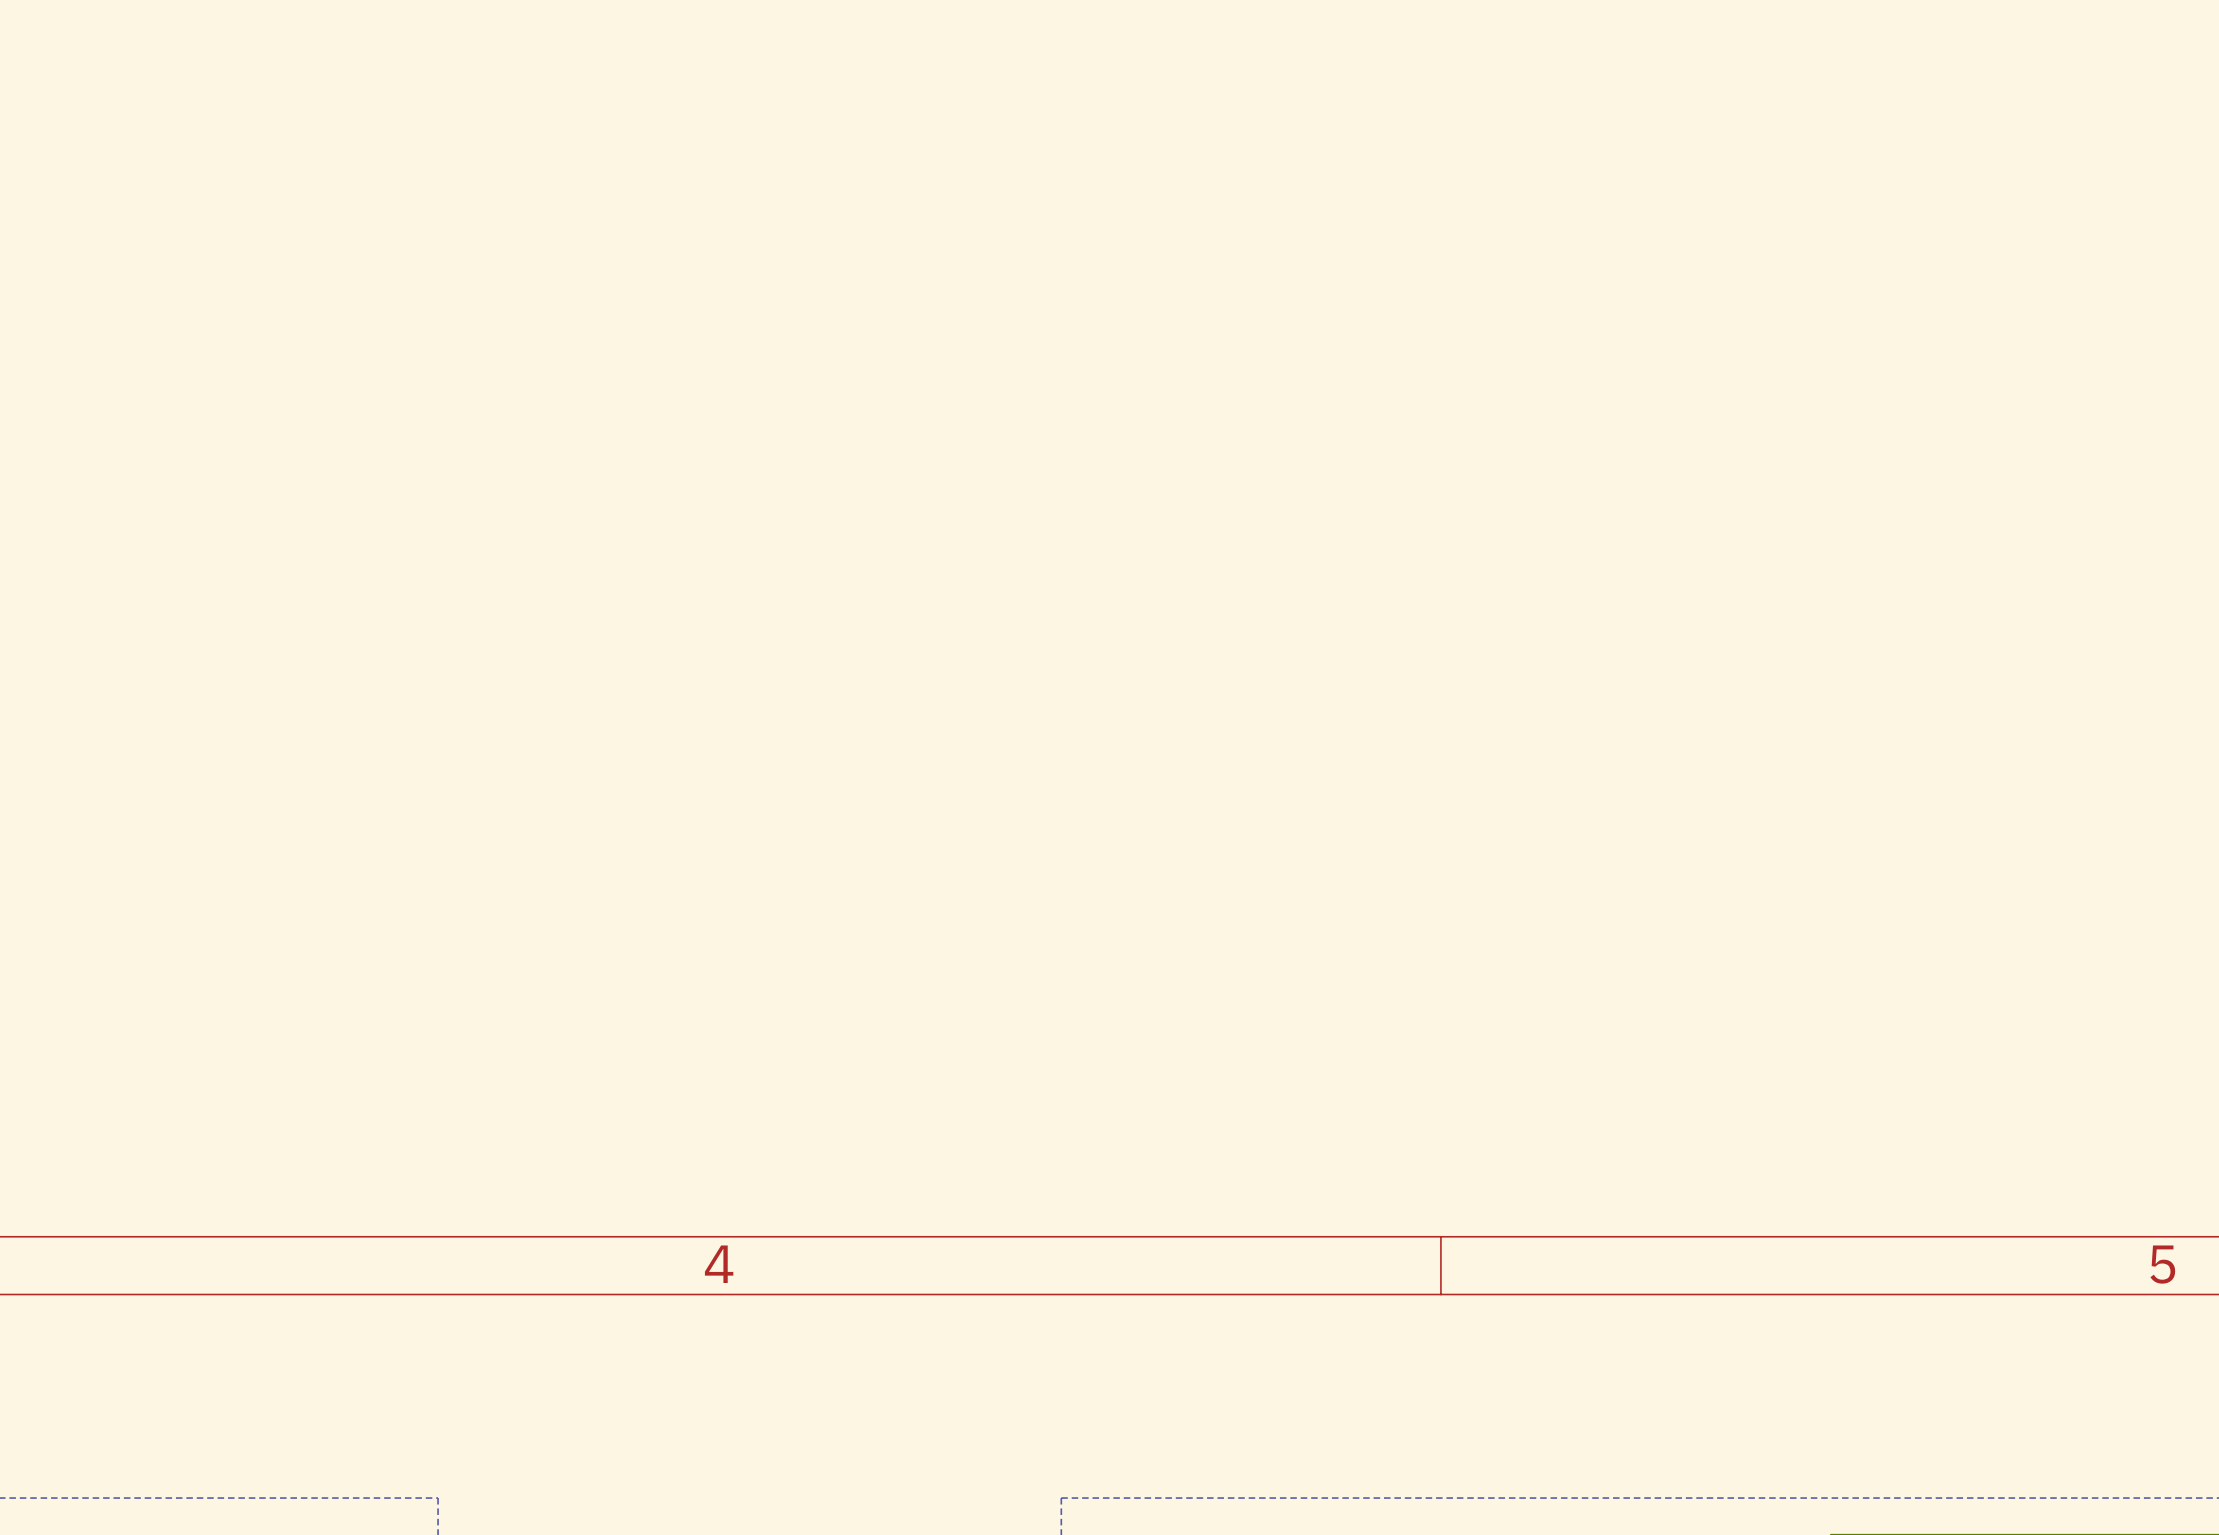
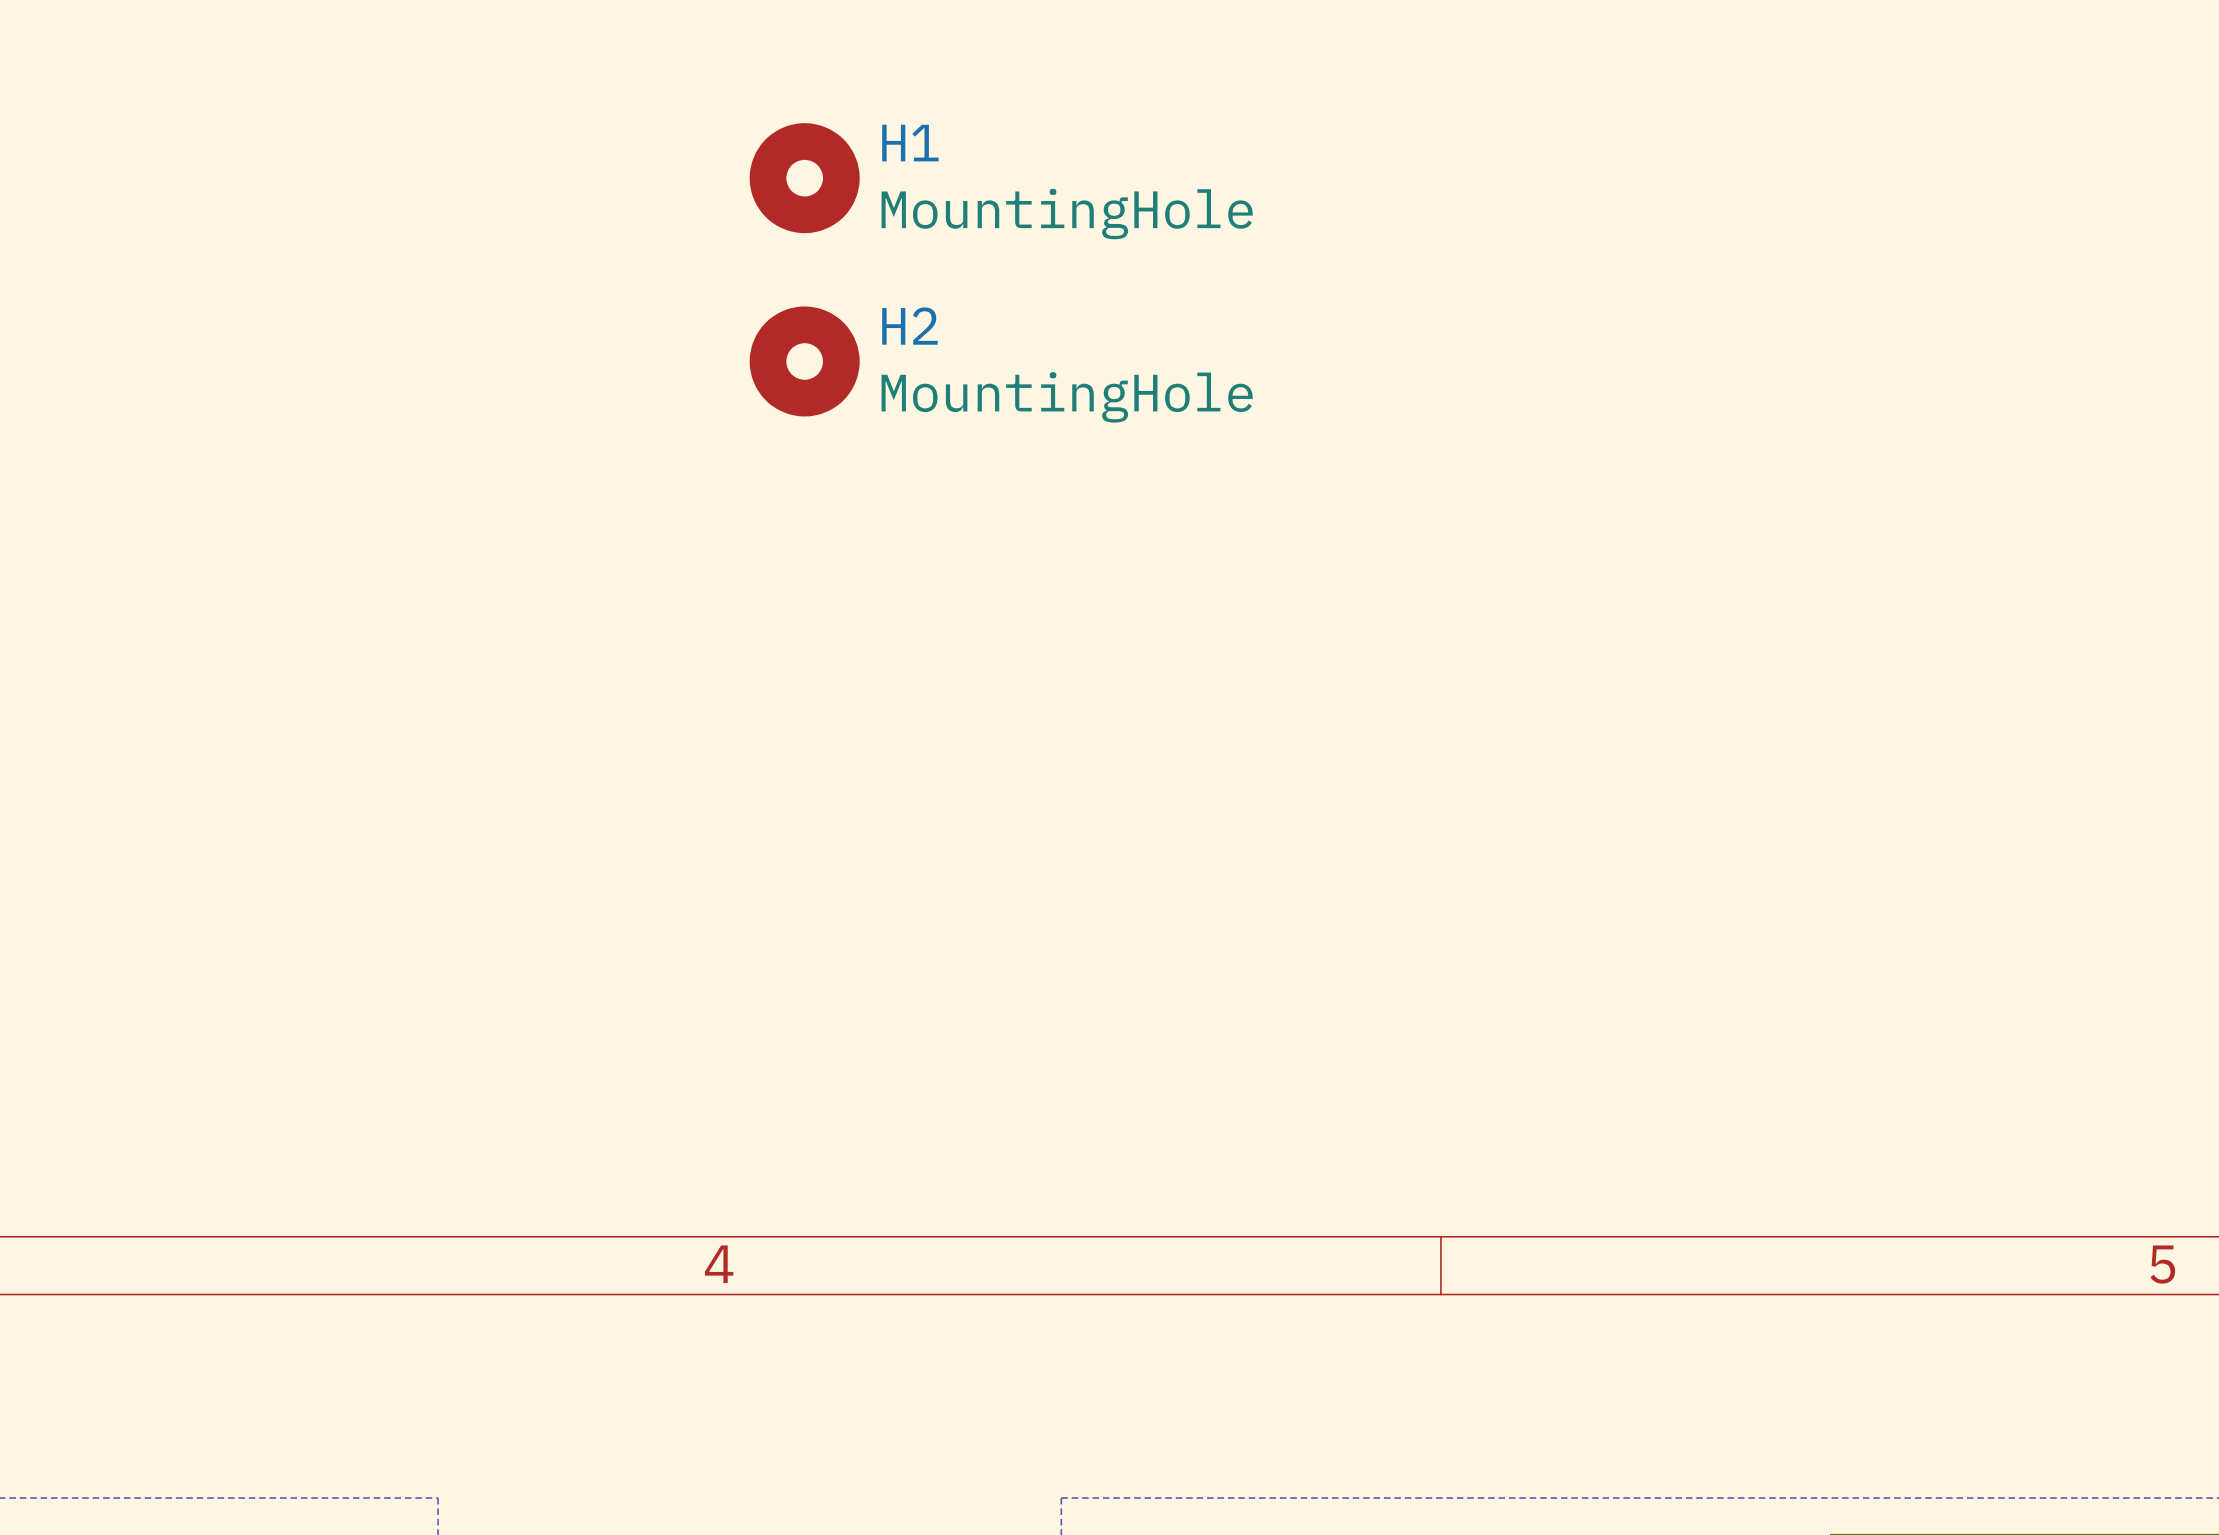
H1: none -> MountingHole (804, 178)
H2: none -> MountingHole (804, 361)

